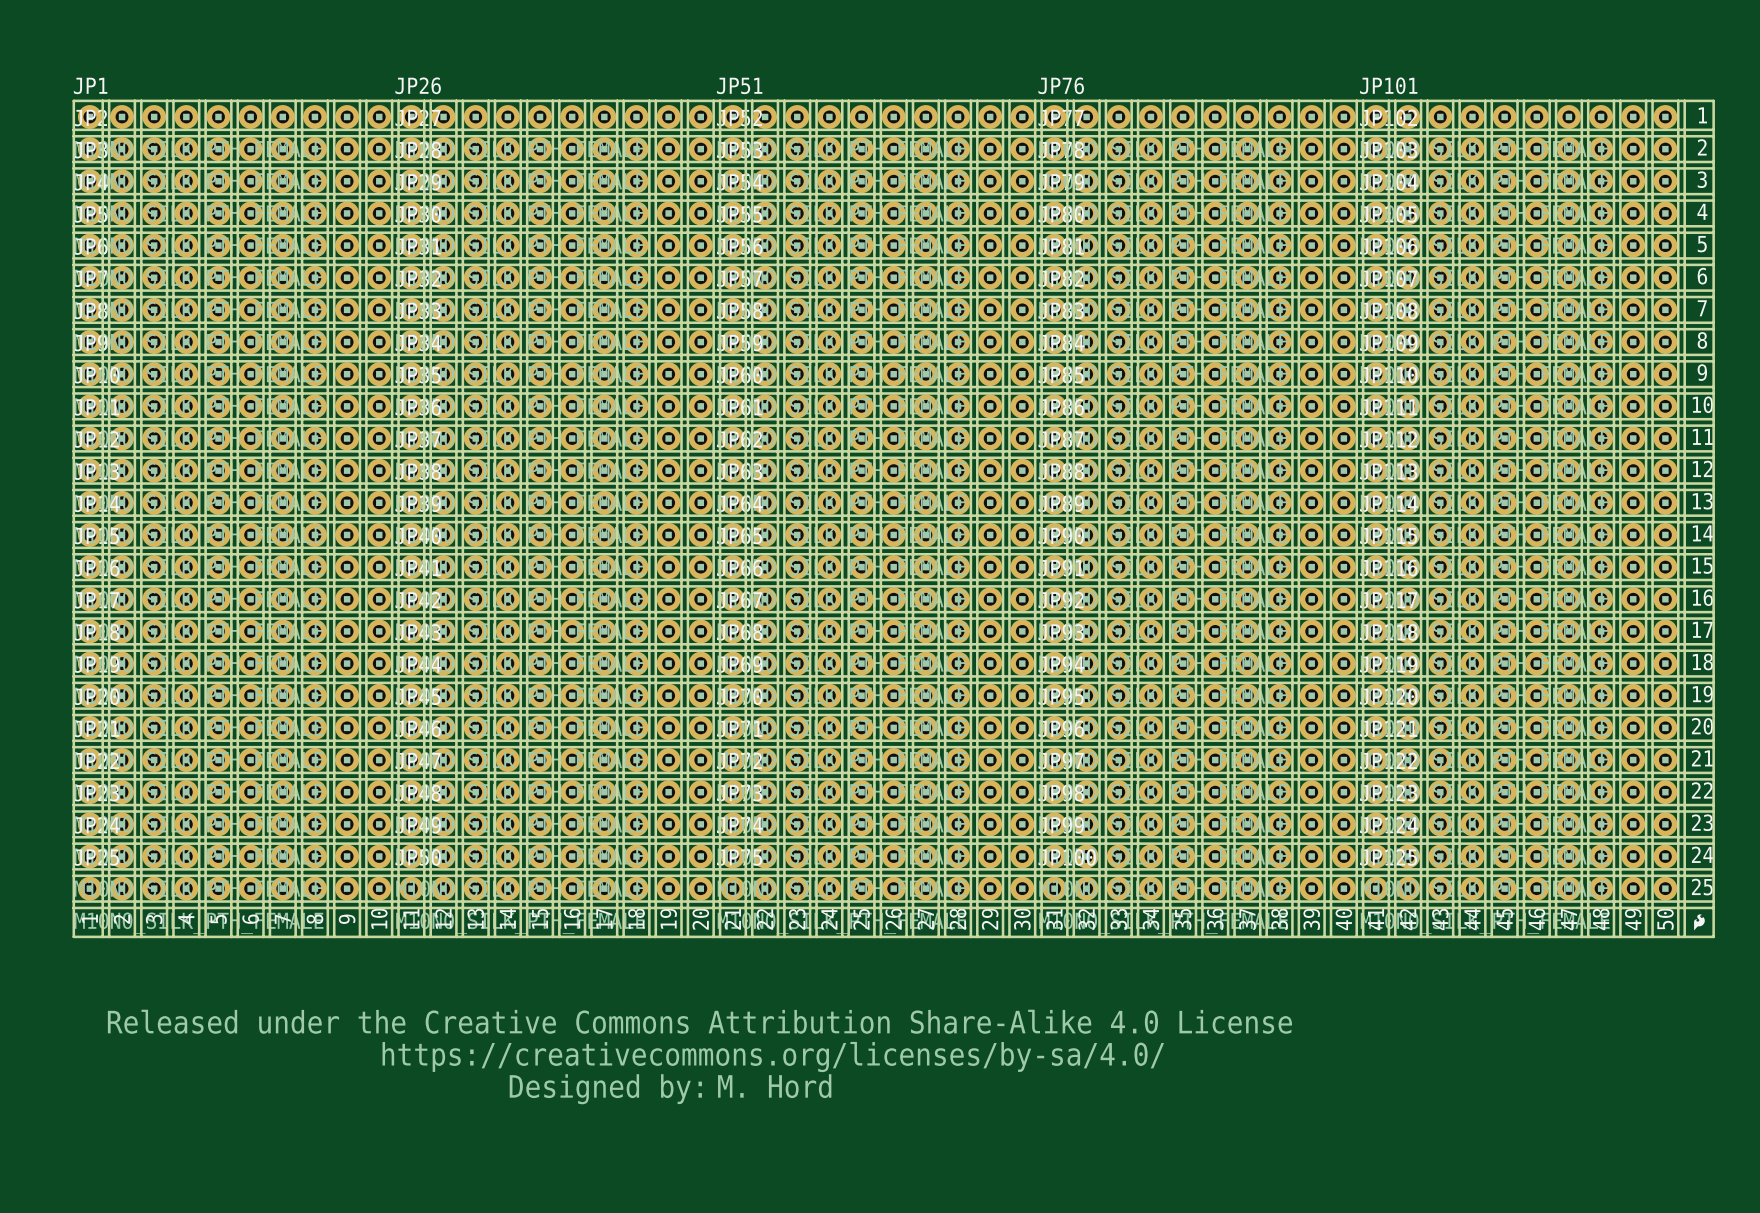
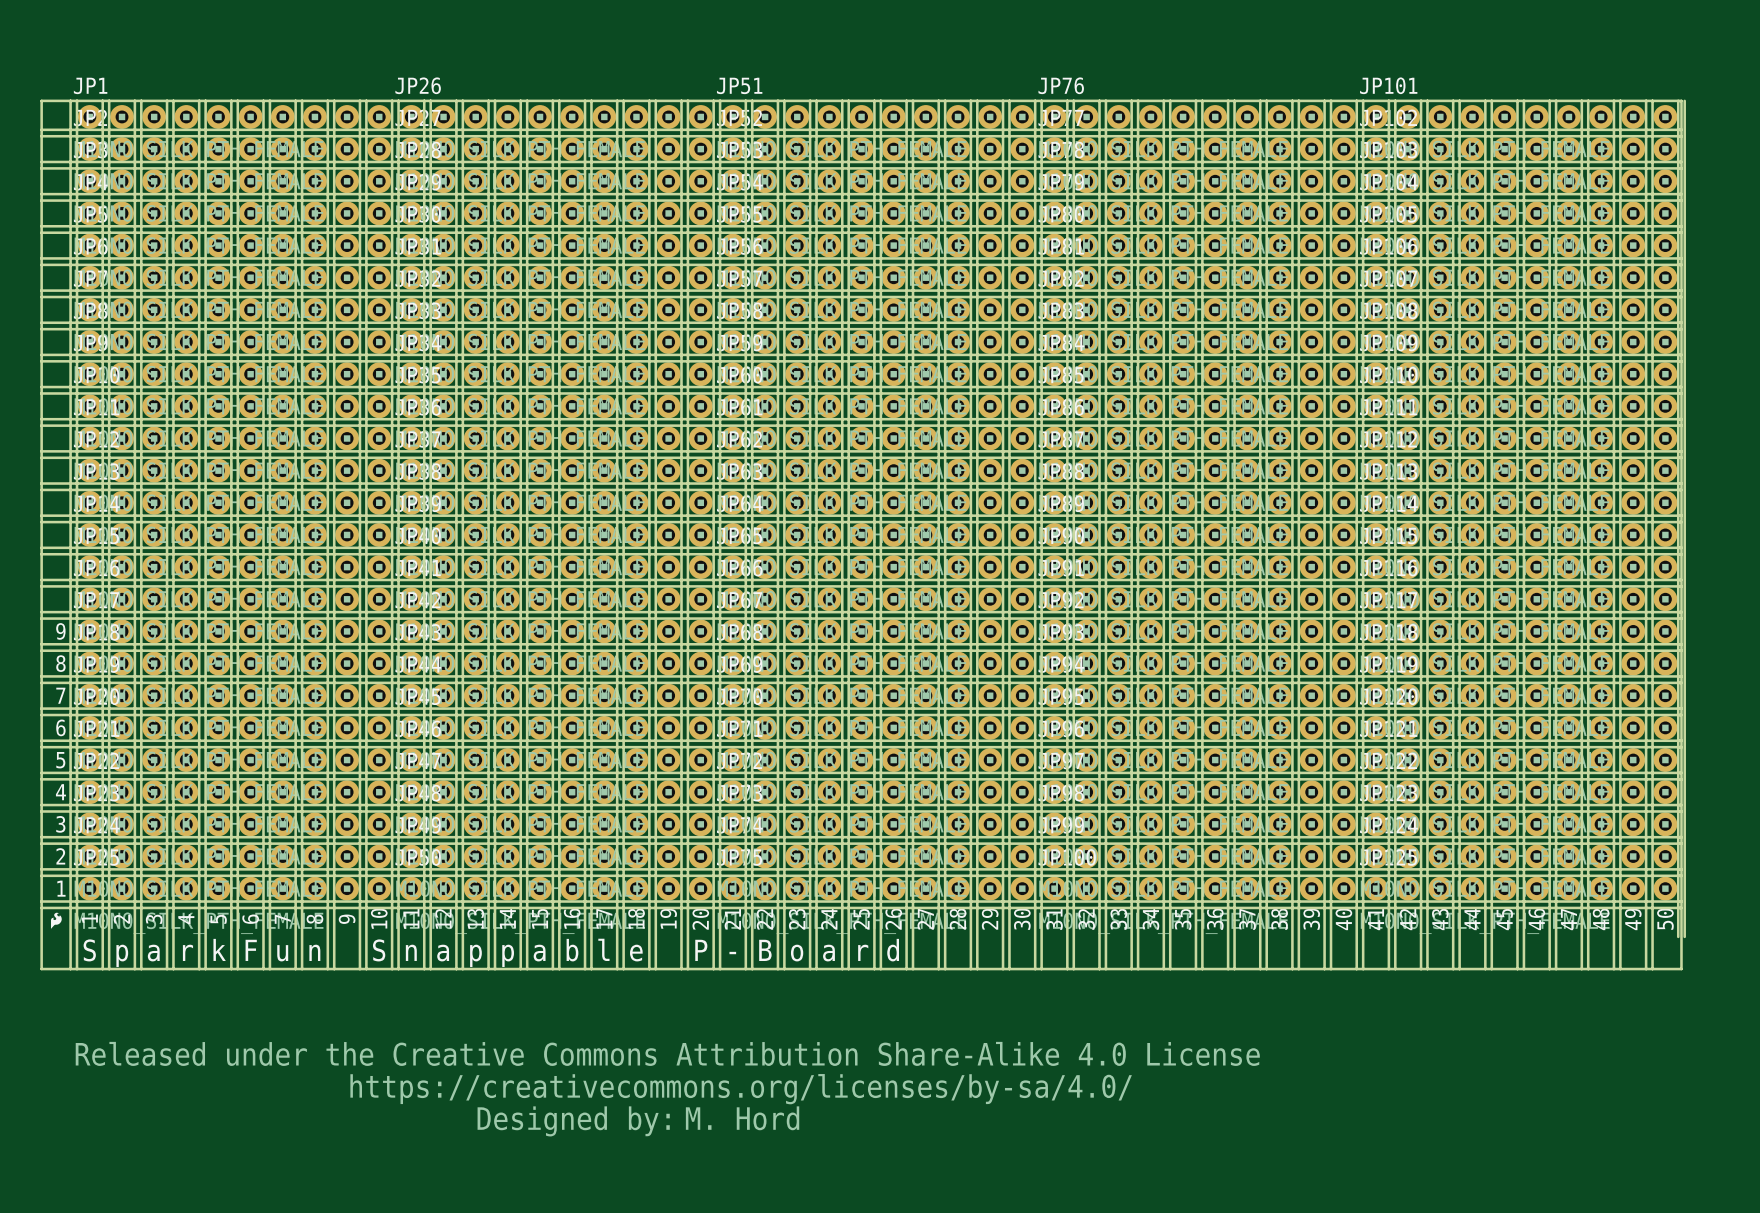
board edge: none -> (70, 100) (70, 969)
board edge: (73, 100) (73, 936) (1713, 936) (1713, 100) (1681, 100) -> (73, 100) (41, 100) (41, 969) (1681, 969) (1681, 100)
board edge: none -> (77, 100) (77, 969)
text: 1 (1702, 115) -> none
board edge: none -> (41, 129) (73, 129)
board edge: (1681, 129) (1713, 129) -> none
board edge: none -> (41, 136) (73, 136)
board edge: (1681, 136) (1713, 136) -> none
text: 2 (1702, 147) -> none
board edge: none -> (41, 161) (73, 161)
board edge: (1681, 161) (1713, 161) -> none
board edge: none -> (41, 168) (73, 168)
board edge: (1681, 168) (1713, 168) -> none
text: 3 (1702, 179) -> none
board edge: none -> (41, 194) (73, 194)
board edge: (1681, 194) (1713, 194) -> none
board edge: none -> (41, 200) (73, 200)
board edge: (1681, 200) (1713, 200) -> none
text: 4 (1702, 211) -> none
board edge: none -> (41, 226) (73, 226)
board edge: (1681, 226) (1713, 226) -> none
board edge: none -> (41, 232) (73, 232)
board edge: (1681, 232) (1713, 232) -> none
text: 5 (1702, 244) -> none
board edge: none -> (41, 258) (73, 258)
board edge: (1681, 258) (1713, 258) -> none
board edge: none -> (41, 264) (73, 264)
board edge: (1681, 264) (1713, 264) -> none
text: 6 (1702, 276) -> none
board edge: none -> (41, 290) (73, 290)
board edge: (1681, 290) (1713, 290) -> none
board edge: none -> (41, 297) (73, 297)
board edge: (1681, 297) (1713, 297) -> none
text: 7 (1702, 308) -> none
board edge: none -> (41, 322) (73, 322)
board edge: (1681, 322) (1713, 322) -> none
board edge: none -> (41, 329) (73, 329)
board edge: (1681, 329) (1713, 329) -> none
text: 8 (1702, 340) -> none
board edge: none -> (41, 354) (73, 354)
board edge: (1681, 354) (1713, 354) -> none
board edge: none -> (41, 361) (73, 361)
board edge: (1681, 361) (1713, 361) -> none
text: 9 (1702, 372) -> none
board edge: none -> (41, 387) (73, 387)
board edge: (1681, 387) (1713, 387) -> none
board edge: none -> (41, 393) (73, 393)
board edge: (1681, 393) (1713, 393) -> none
text: 10 (1702, 404) -> none
board edge: none -> (41, 419) (73, 419)
board edge: (1681, 419) (1713, 419) -> none
board edge: none -> (41, 425) (73, 425)
board edge: (1681, 425) (1713, 425) -> none
text: 11 (1702, 436) -> none
board edge: none -> (41, 451) (73, 451)
board edge: (1681, 451) (1713, 451) -> none
board edge: none -> (41, 457) (73, 457)
board edge: (1681, 457) (1713, 457) -> none
text: 12 (1702, 468) -> none
board edge: none -> (41, 483) (73, 483)
board edge: (1681, 483) (1713, 483) -> none
board edge: none -> (41, 489) (73, 489)
board edge: (1681, 489) (1713, 489) -> none
text: 13 (1702, 501) -> none
board edge: none -> (41, 515) (73, 515)
board edge: (1681, 515) (1713, 515) -> none
board edge: none -> (41, 522) (73, 522)
board edge: (1681, 522) (1713, 522) -> none
text: 14 (1703, 533) -> none
board edge: none -> (41, 547) (73, 547)
board edge: (1681, 547) (1713, 547) -> none
board edge: none -> (41, 554) (73, 554)
board edge: (1681, 554) (1713, 554) -> none
text: 15 (1702, 565) -> none
board edge: none -> (41, 579) (73, 579)
board edge: (1681, 579) (1713, 579) -> none
board edge: none -> (41, 586) (73, 586)
board edge: (1681, 586) (1713, 586) -> none
text: 16 (1702, 597) -> none
board edge: none -> (41, 612) (73, 612)
board edge: (1681, 612) (1713, 612) -> none
board edge: none -> (41, 618) (73, 618)
board edge: (1681, 618) (1713, 618) -> none
text: 17 (1702, 629) -> none
text: none -> 9 (60, 631)
board edge: none -> (41, 644) (73, 644)
board edge: (1681, 644) (1713, 644) -> none
board edge: none -> (41, 650) (73, 650)
board edge: (1681, 650) (1713, 650) -> none
text: 18 (1702, 661) -> none
text: none -> 8 (60, 663)
board edge: none -> (41, 676) (73, 676)
board edge: (1681, 676) (1713, 676) -> none
board edge: none -> (41, 682) (73, 682)
board edge: (1681, 682) (1713, 682) -> none
text: 19 (1702, 694) -> none
text: none -> 7 (60, 695)
board edge: none -> (41, 708) (73, 708)
board edge: (1681, 708) (1713, 708) -> none
board edge: none -> (41, 715) (73, 715)
board edge: (1681, 715) (1713, 715) -> none
text: 20 (1702, 726) -> none
text: none -> 6 (60, 727)
board edge: none -> (41, 740) (73, 740)
board edge: (1681, 740) (1713, 740) -> none
board edge: none -> (41, 747) (73, 747)
board edge: (1681, 747) (1713, 747) -> none
text: 21 (1702, 758) -> none
text: none -> 5 (60, 760)
board edge: none -> (41, 772) (73, 772)
board edge: (1681, 772) (1713, 772) -> none
board edge: none -> (41, 779) (73, 779)
board edge: (1681, 779) (1713, 779) -> none
text: 22 (1702, 790) -> none
text: none -> 4 (60, 792)
board edge: none -> (41, 805) (73, 805)
board edge: (1681, 805) (1713, 805) -> none
board edge: none -> (41, 811) (73, 811)
board edge: (1681, 811) (1713, 811) -> none
text: 23 (1702, 822) -> none
text: none -> 3 (60, 824)
board edge: none -> (41, 837) (73, 837)
board edge: (1681, 837) (1713, 837) -> none
board edge: none -> (41, 843) (73, 843)
board edge: (1681, 843) (1713, 843) -> none
text: 24 (1702, 854) -> none
text: none -> 2 (60, 856)
board edge: none -> (41, 869) (73, 869)
board edge: (1681, 869) (1713, 869) -> none
board edge: none -> (41, 875) (73, 875)
board edge: (1681, 875) (1713, 875) -> none
text: 25 (1702, 887) -> none
text: none -> 1 (61, 888)
board edge: none -> (41, 901) (73, 901)
board edge: (1681, 901) (1713, 901) -> none
board edge: none -> (41, 907) (73, 907)
board edge: (1681, 907) (1713, 907) -> none
drawing: none -> [51, 912, 62, 929]
drawing: [1694, 914, 1705, 931] -> none
board edge: none -> (102, 936) (102, 969)
board edge: none -> (109, 936) (109, 969)
board edge: none -> (134, 936) (134, 969)
board edge: none -> (141, 936) (141, 969)
board edge: none -> (167, 936) (167, 969)
board edge: none -> (173, 936) (173, 969)
board edge: none -> (199, 936) (199, 969)
board edge: none -> (205, 936) (205, 969)
board edge: none -> (231, 936) (231, 969)
board edge: none -> (237, 936) (237, 969)
board edge: none -> (263, 936) (263, 969)
board edge: none -> (269, 936) (269, 969)
board edge: none -> (295, 936) (295, 969)
board edge: none -> (302, 936) (302, 969)
board edge: none -> (327, 936) (327, 969)
board edge: none -> (334, 936) (334, 969)
board edge: none -> (359, 936) (359, 969)
board edge: none -> (366, 936) (366, 969)
board edge: none -> (392, 936) (392, 969)
board edge: none -> (398, 936) (398, 969)
board edge: none -> (424, 936) (424, 969)
board edge: none -> (430, 936) (430, 969)
board edge: none -> (456, 936) (456, 969)
board edge: none -> (462, 936) (462, 969)
board edge: none -> (488, 936) (488, 969)
board edge: none -> (495, 936) (495, 969)
board edge: none -> (520, 936) (520, 969)
board edge: none -> (527, 936) (527, 969)
board edge: none -> (552, 936) (552, 969)
board edge: none -> (559, 936) (559, 969)
board edge: none -> (585, 936) (585, 969)
board edge: none -> (591, 936) (591, 969)
board edge: none -> (617, 936) (617, 969)
board edge: none -> (623, 936) (623, 969)
board edge: none -> (649, 936) (649, 969)
board edge: none -> (655, 936) (655, 969)
board edge: none -> (681, 936) (681, 969)
board edge: none -> (687, 936) (687, 969)
board edge: none -> (713, 936) (713, 969)
board edge: none -> (720, 936) (720, 969)
board edge: none -> (745, 936) (745, 969)
board edge: none -> (752, 936) (752, 969)
board edge: none -> (777, 936) (777, 969)
board edge: none -> (784, 936) (784, 969)
board edge: none -> (810, 936) (810, 969)
board edge: none -> (816, 936) (816, 969)
board edge: none -> (842, 936) (842, 969)
board edge: none -> (848, 936) (848, 969)
board edge: none -> (874, 936) (874, 969)
board edge: none -> (880, 936) (880, 969)
board edge: none -> (906, 936) (906, 969)
board edge: none -> (913, 936) (913, 969)
board edge: none -> (938, 936) (938, 969)
board edge: none -> (945, 936) (945, 969)
board edge: none -> (970, 936) (970, 969)
board edge: none -> (977, 936) (977, 969)
board edge: none -> (1003, 936) (1003, 969)
board edge: none -> (1009, 936) (1009, 969)
board edge: none -> (1035, 936) (1035, 969)
board edge: none -> (1041, 936) (1041, 969)
board edge: none -> (1067, 936) (1067, 969)
board edge: none -> (1073, 936) (1073, 969)
board edge: none -> (1099, 936) (1099, 969)
board edge: none -> (1105, 936) (1105, 969)
board edge: none -> (1131, 936) (1131, 969)
board edge: none -> (1138, 936) (1138, 969)
board edge: none -> (1163, 936) (1163, 969)
board edge: none -> (1170, 936) (1170, 969)
board edge: none -> (1195, 936) (1195, 969)
board edge: none -> (1202, 936) (1202, 969)
board edge: none -> (1228, 936) (1228, 969)
board edge: none -> (1234, 936) (1234, 969)
board edge: none -> (1260, 936) (1260, 969)
board edge: none -> (1266, 936) (1266, 969)
board edge: none -> (1292, 936) (1292, 969)
board edge: none -> (1298, 936) (1298, 969)
board edge: none -> (1324, 936) (1324, 969)
board edge: none -> (1331, 936) (1331, 969)
board edge: none -> (1356, 936) (1356, 969)
board edge: none -> (1363, 936) (1363, 969)
board edge: none -> (1388, 936) (1388, 969)
board edge: none -> (1395, 936) (1395, 969)
board edge: none -> (1421, 936) (1421, 969)
board edge: none -> (1427, 936) (1427, 969)
board edge: none -> (1453, 936) (1453, 969)
board edge: none -> (1459, 936) (1459, 969)
board edge: none -> (1485, 936) (1485, 969)
board edge: none -> (1491, 936) (1491, 969)
board edge: none -> (1517, 936) (1517, 969)
board edge: none -> (1523, 936) (1523, 969)
board edge: none -> (1549, 936) (1549, 969)
board edge: none -> (1556, 936) (1556, 969)
board edge: none -> (1581, 936) (1581, 969)
board edge: none -> (1588, 936) (1588, 969)
board edge: none -> (1613, 936) (1613, 969)
board edge: none -> (1620, 936) (1620, 969)
board edge: none -> (1646, 936) (1646, 969)
board edge: none -> (1652, 936) (1652, 969)
text: none -> k (219, 949)
text: none -> l (603, 949)
text: none -> S (89, 950)
text: none -> F (251, 950)
text: none -> S (379, 950)
text: none -> b (572, 950)
text: none -> P (701, 950)
text: none -> B (765, 950)
text: none -> d (893, 950)
text: none -> r (187, 952)
text: none -> n (314, 952)
text: none -> n (411, 952)
text: none -> r (863, 952)
text: none -> a (153, 953)
text: none -> u (282, 953)
text: none -> a (443, 953)
text: none -> a (539, 953)
text: none -> e (636, 953)
text: none -> - (732, 953)
text: none -> o (797, 953)
text: none -> a (828, 953)
text: none -> p (122, 955)
text: none -> p (475, 955)
text: none -> p (508, 955)
drawing position: (699, 1057) -> (667, 1089)
text position: M. Hord (774, 1086) -> M. Hord (742, 1118)

